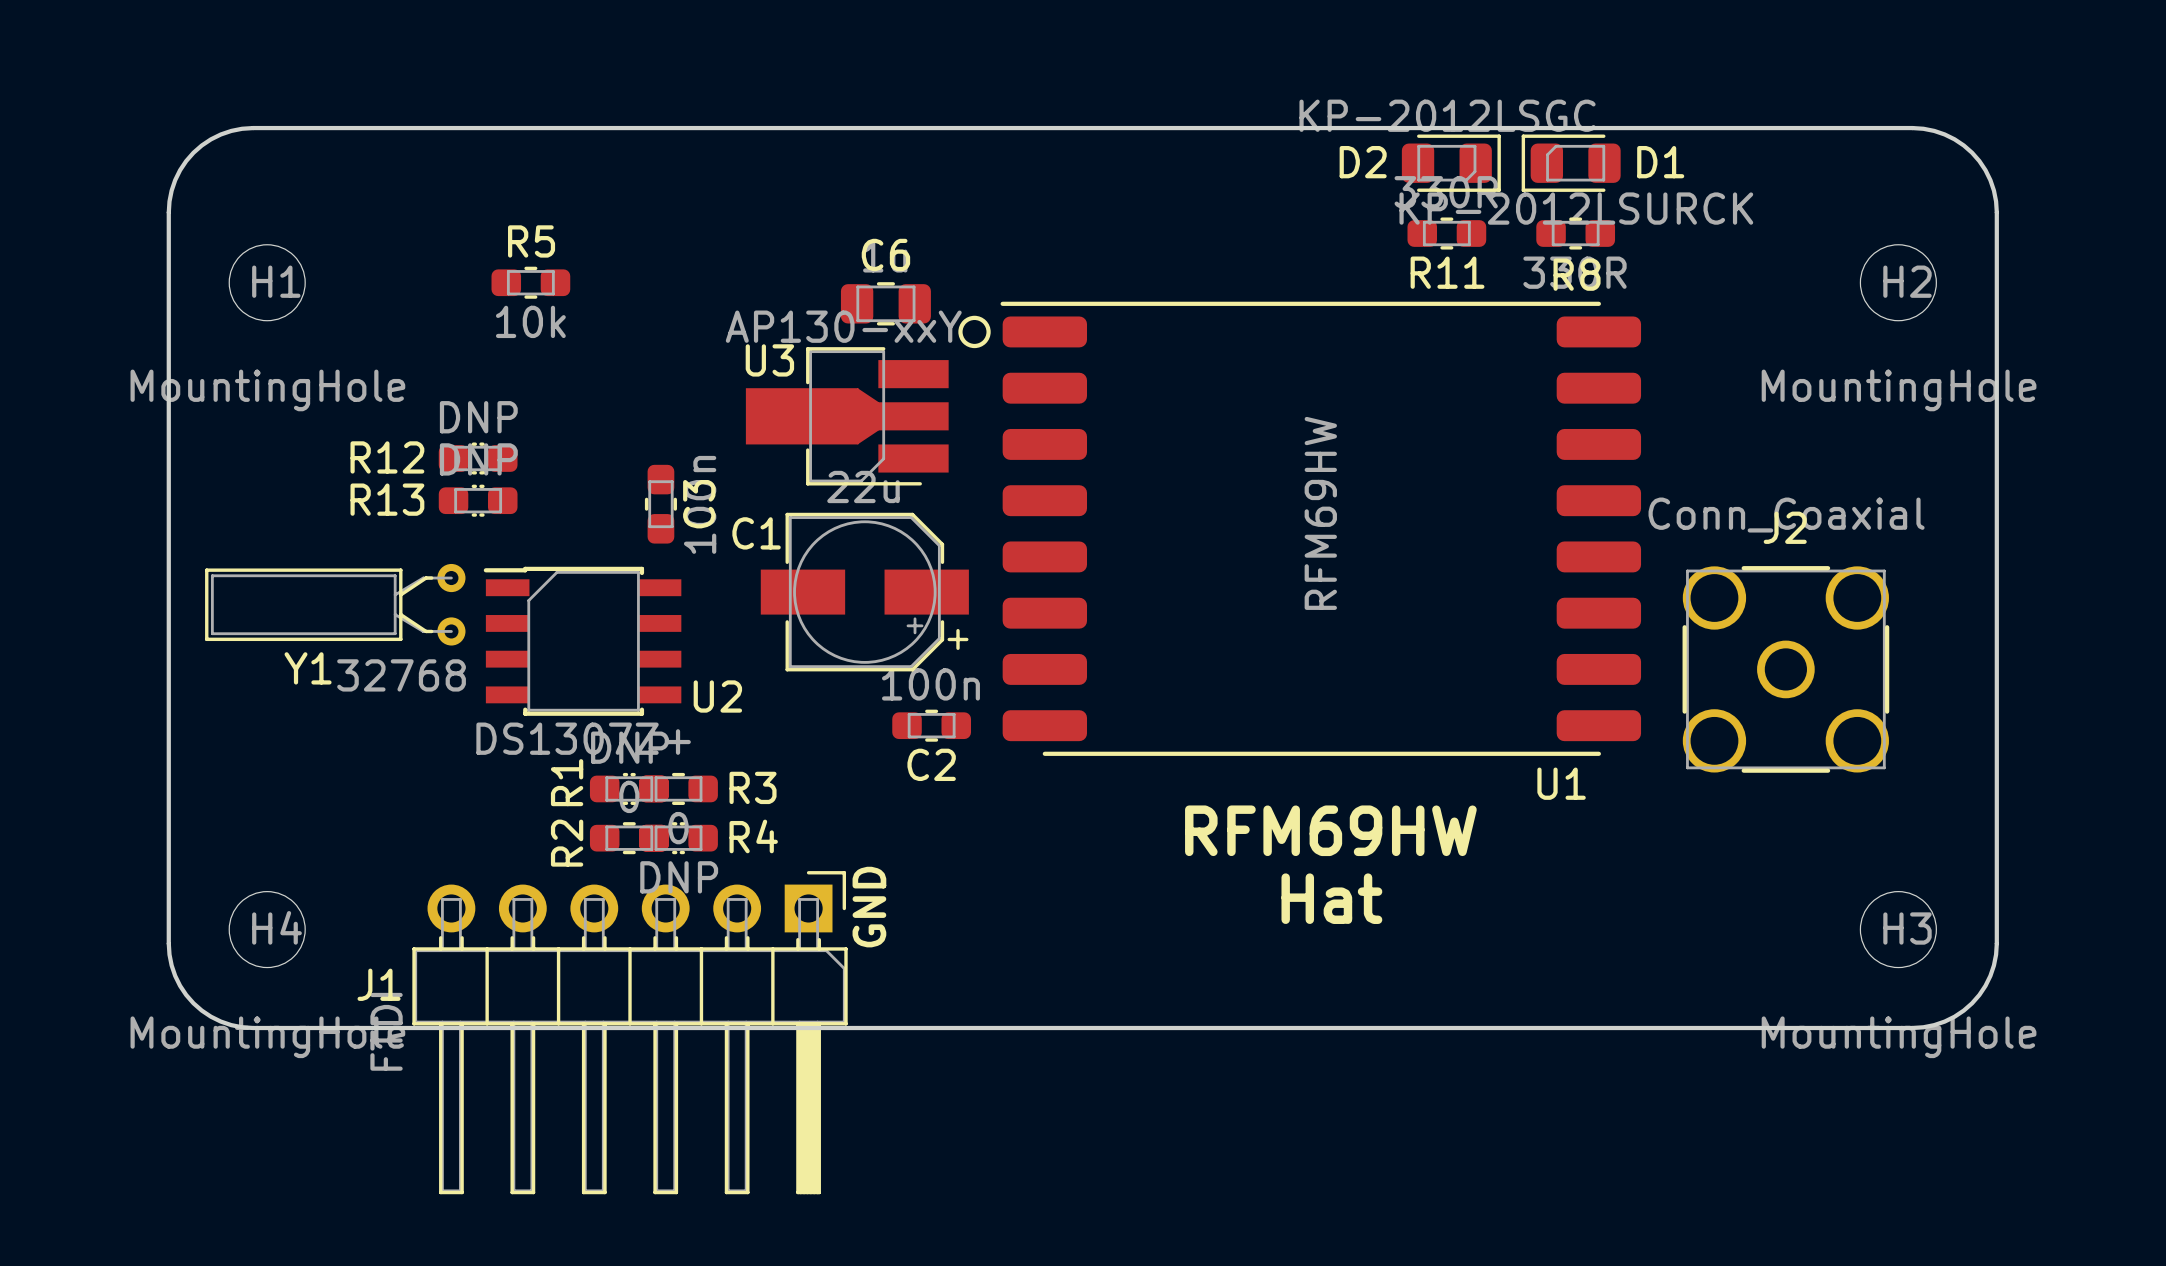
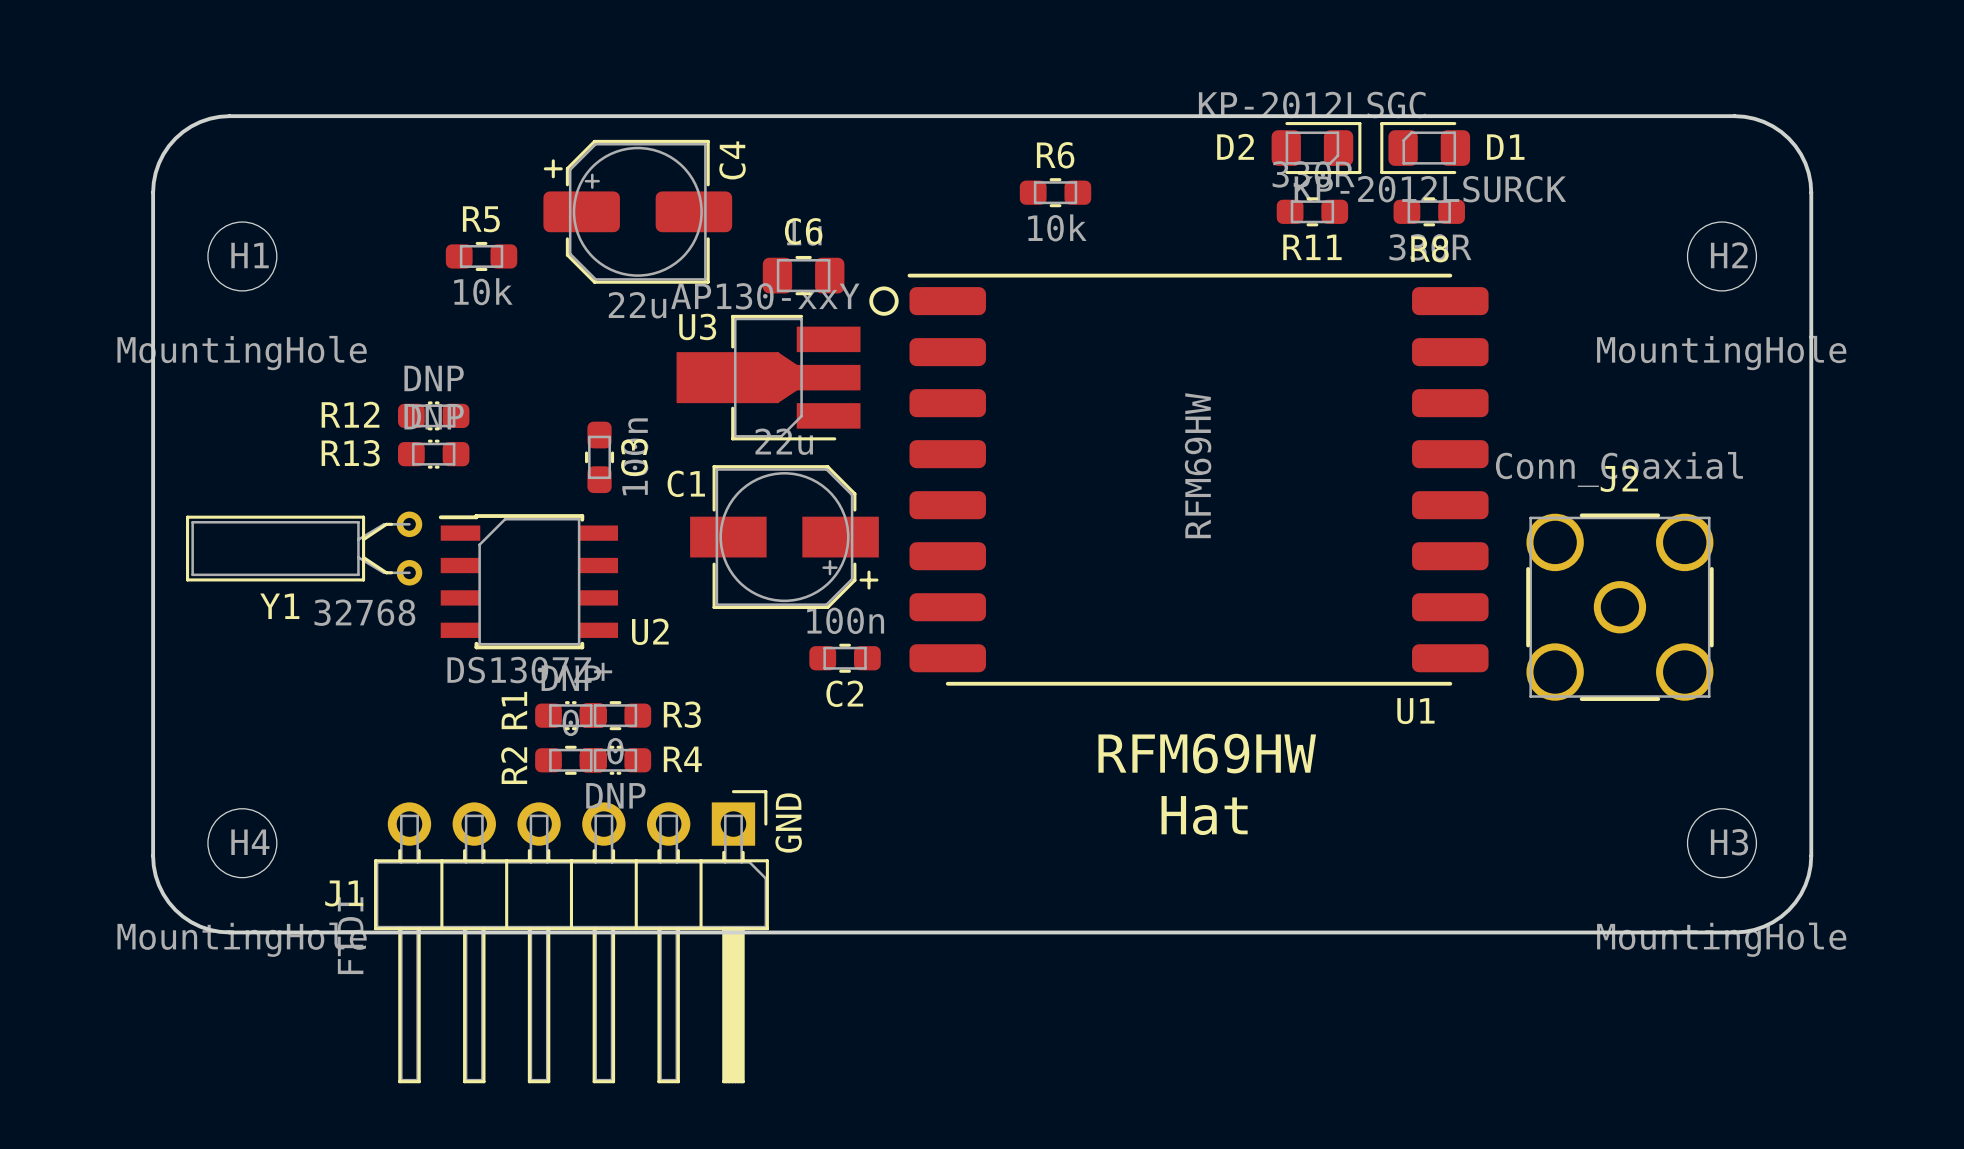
R6: none -> 10k (1055, 192)
C4: none -> 22u (637, 211)

